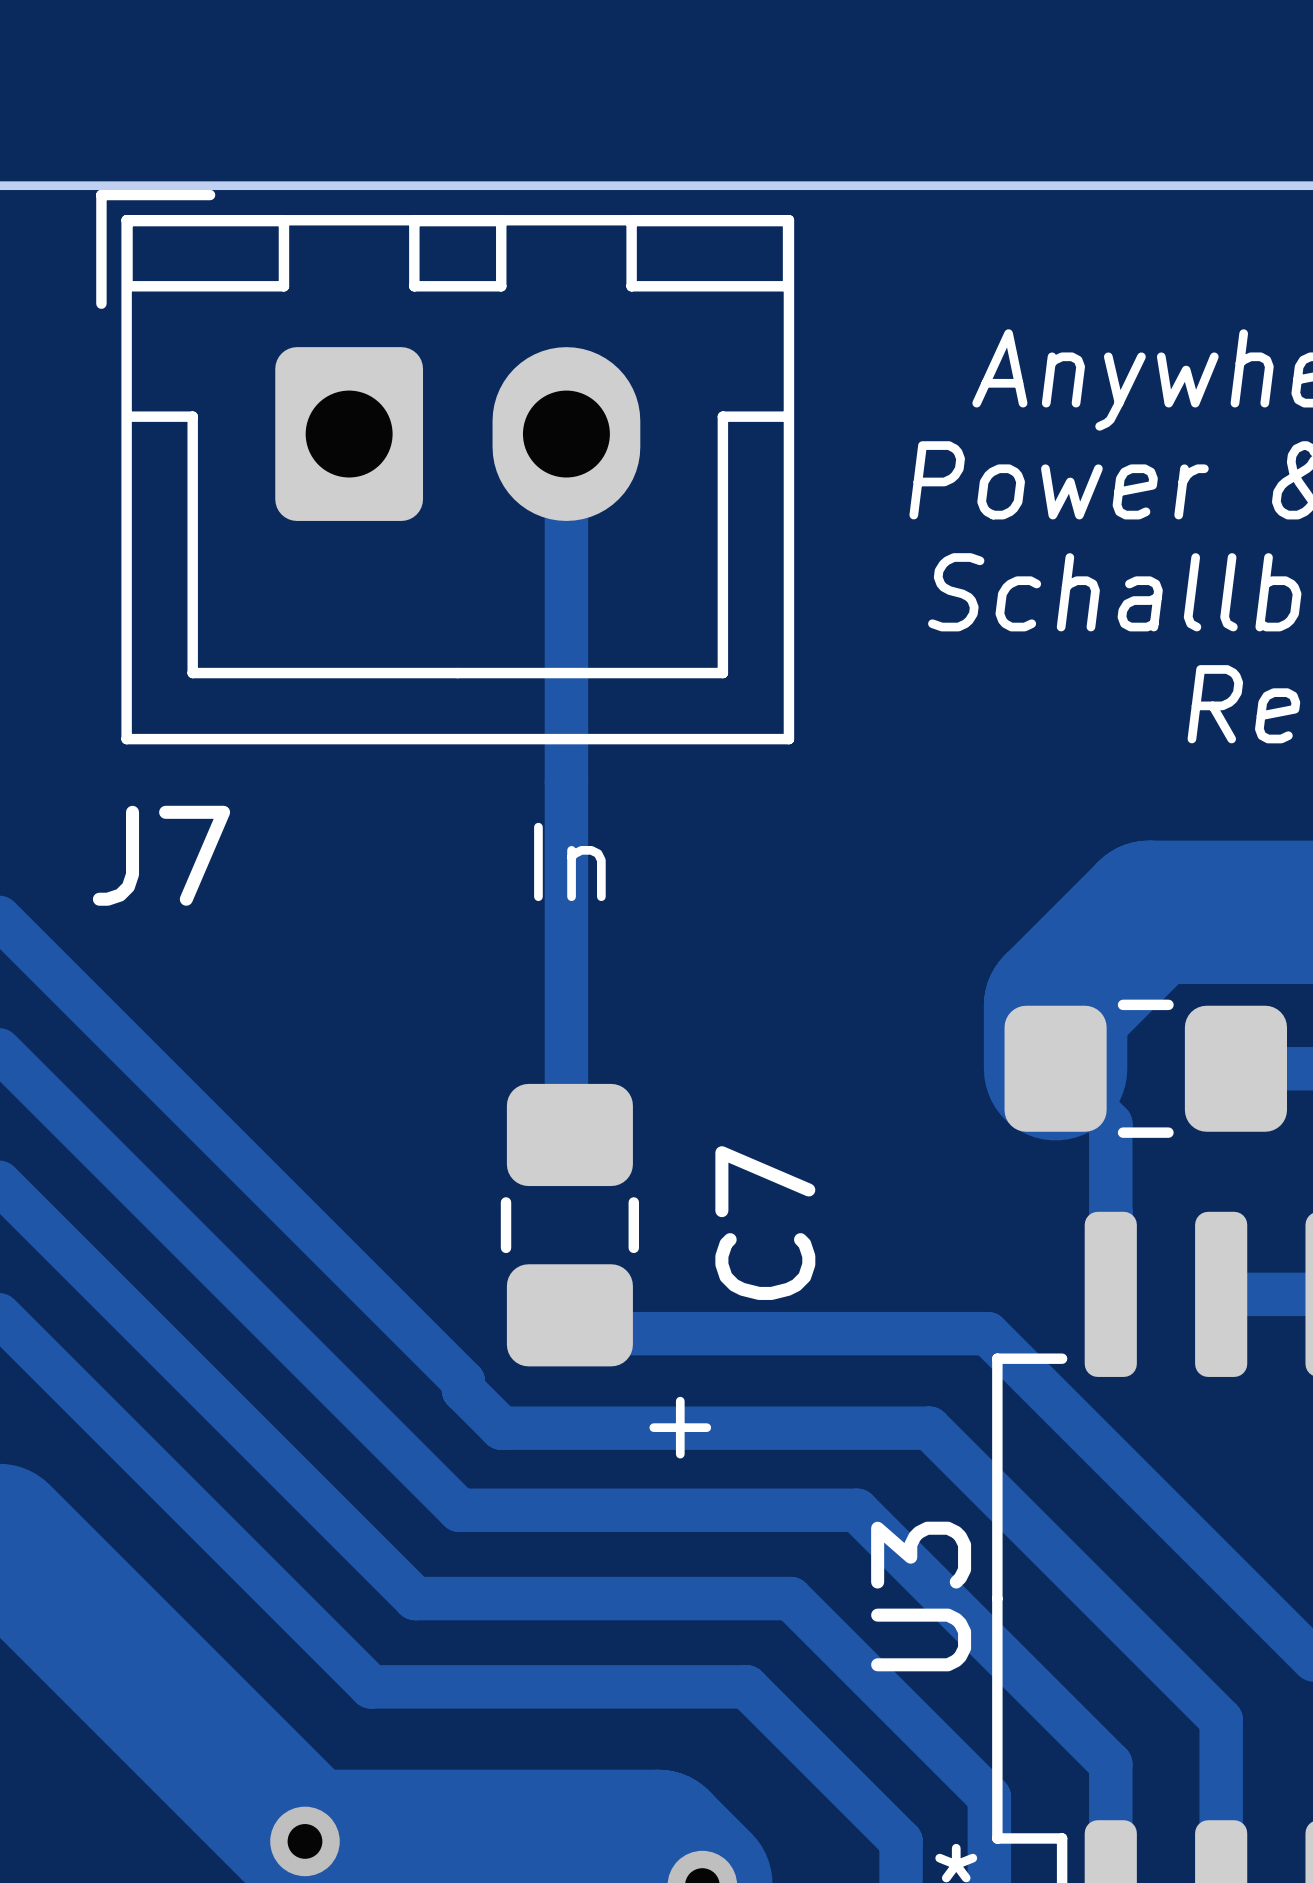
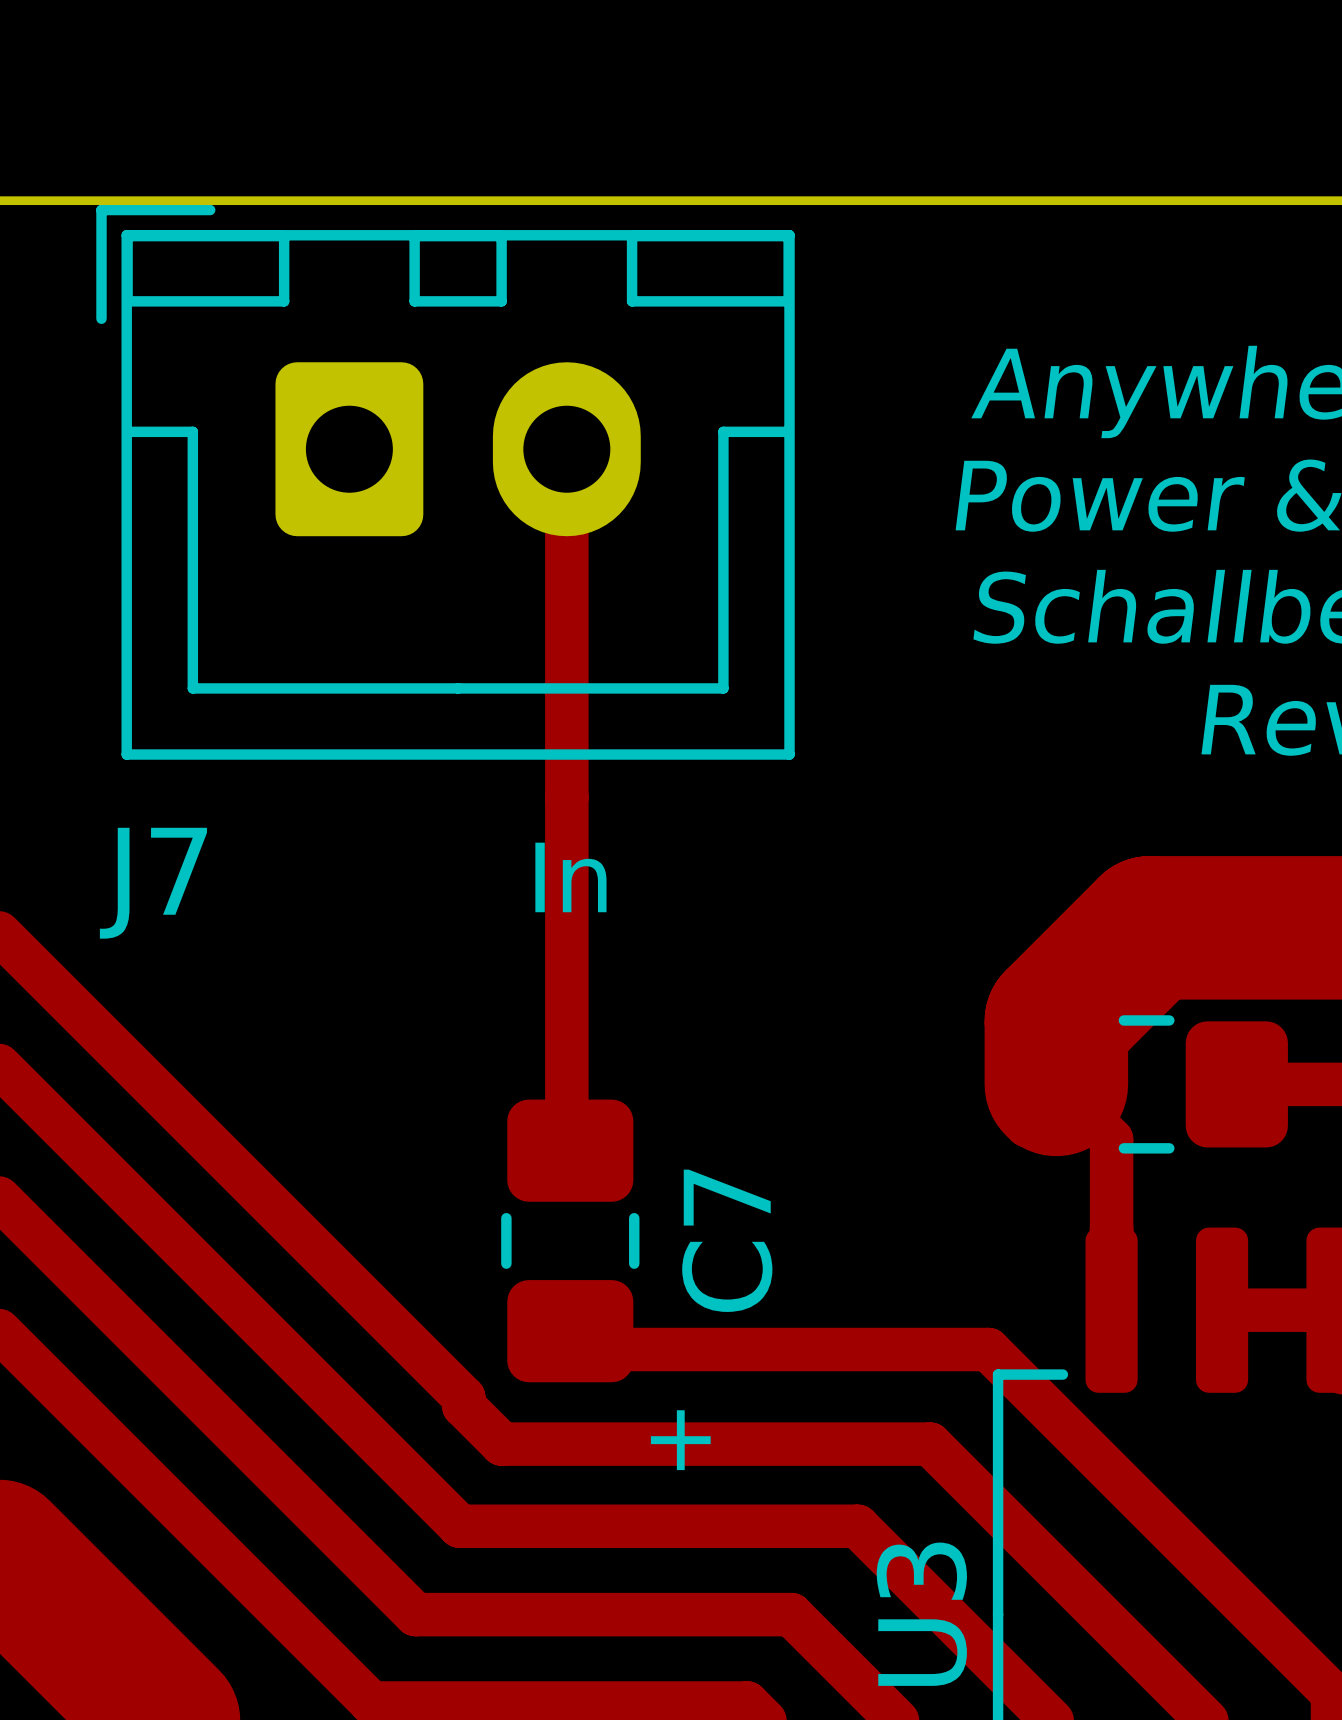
C7 name position: C7 (765, 1223) -> C7 (727, 1240)

